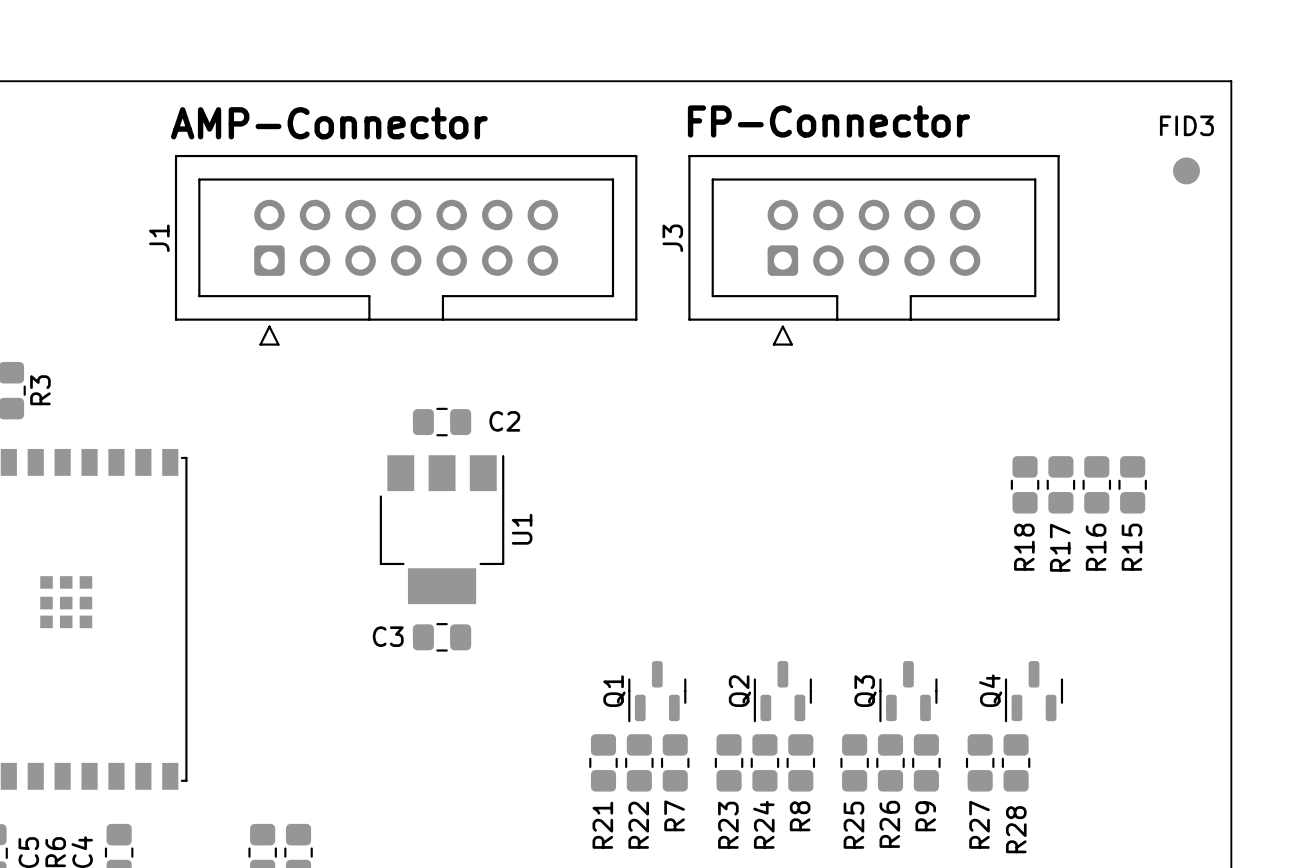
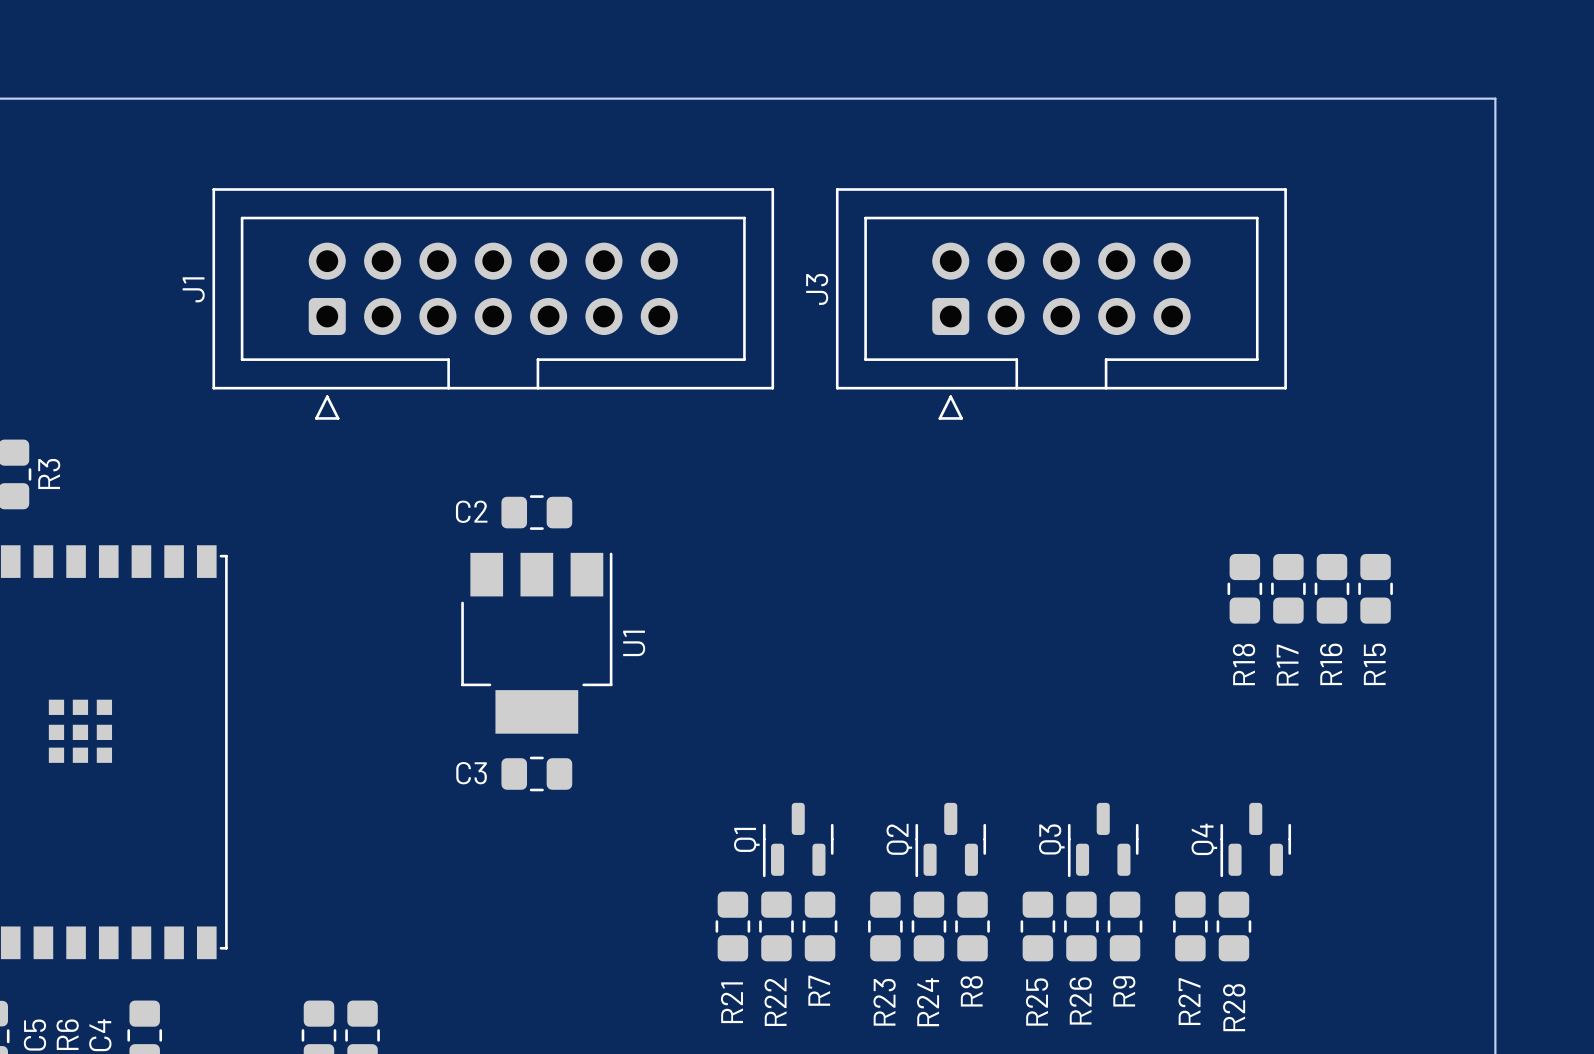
text: FP-Connector (828, 121) -> none
text: AMP-Connector (329, 123) -> none
FID3: (1186, 170) -> none
C2 name position: C2 (504, 421) -> C2 (471, 511)

